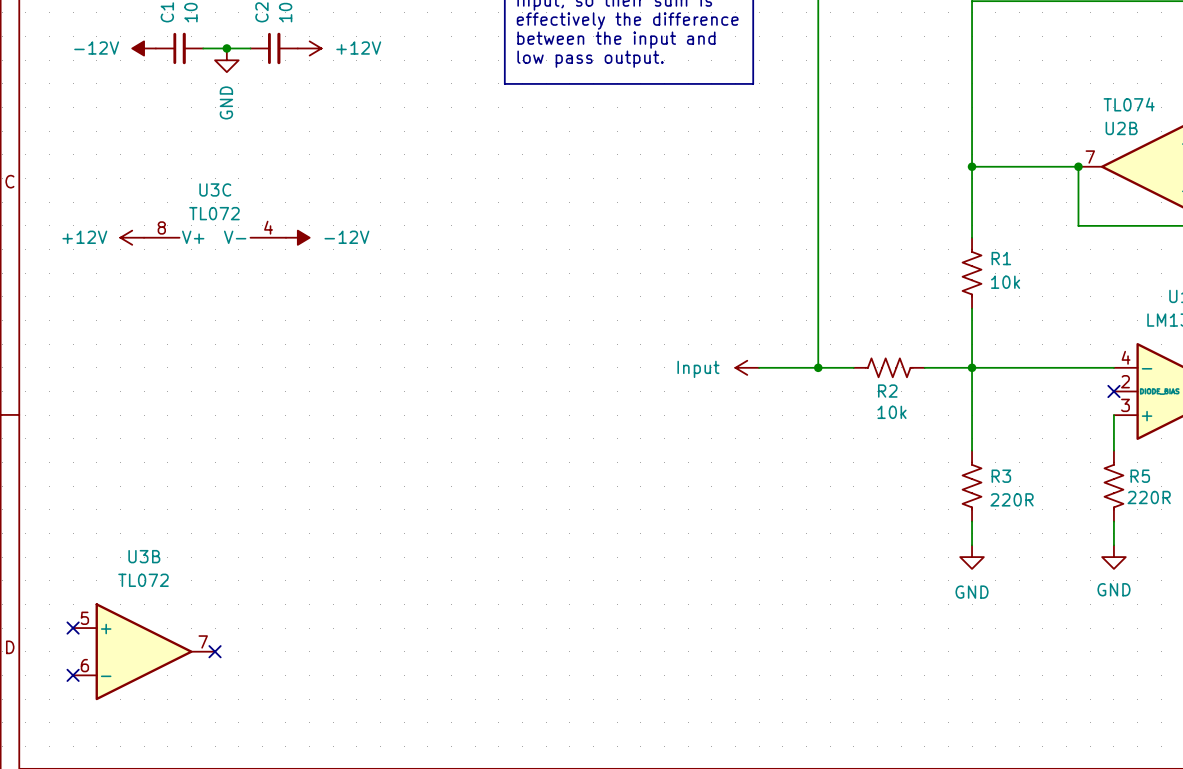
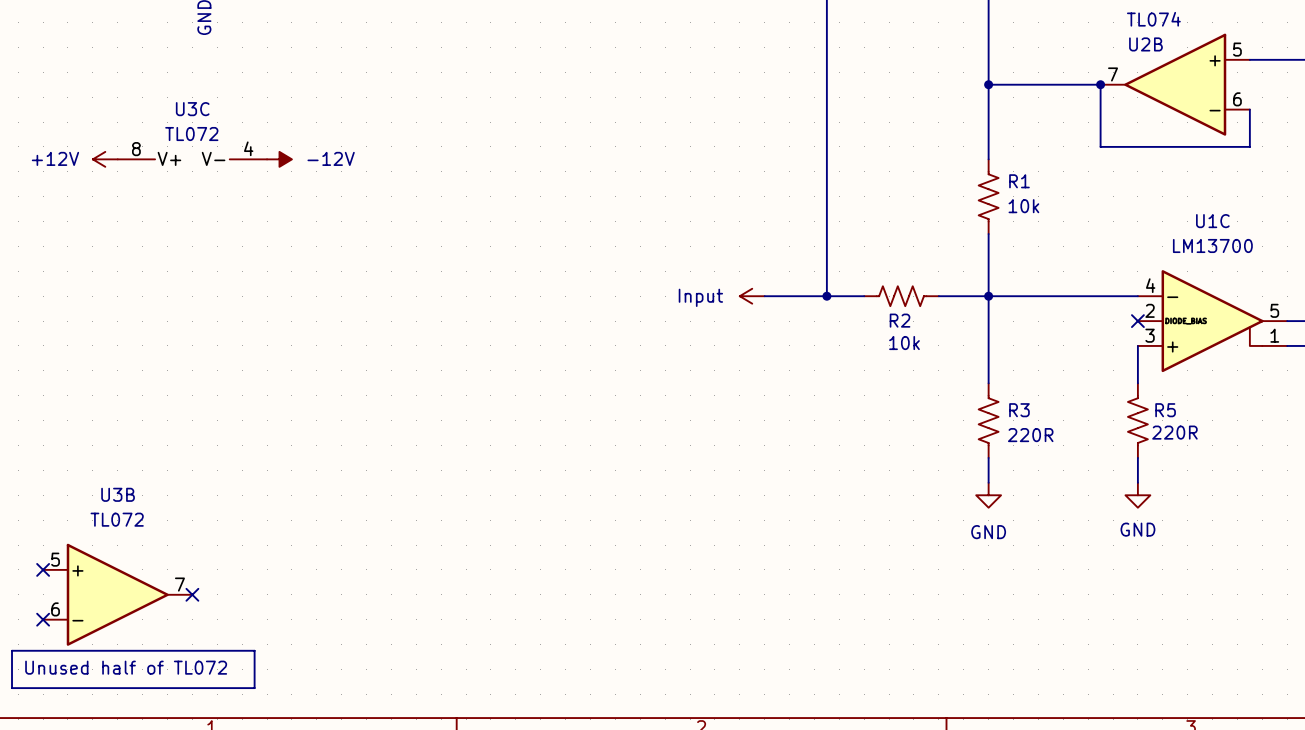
line: none -> (12, 650) (254, 650) (254, 688) (12, 688) (12, 650)
text: none -> Unused half of TL072 (126, 667)

